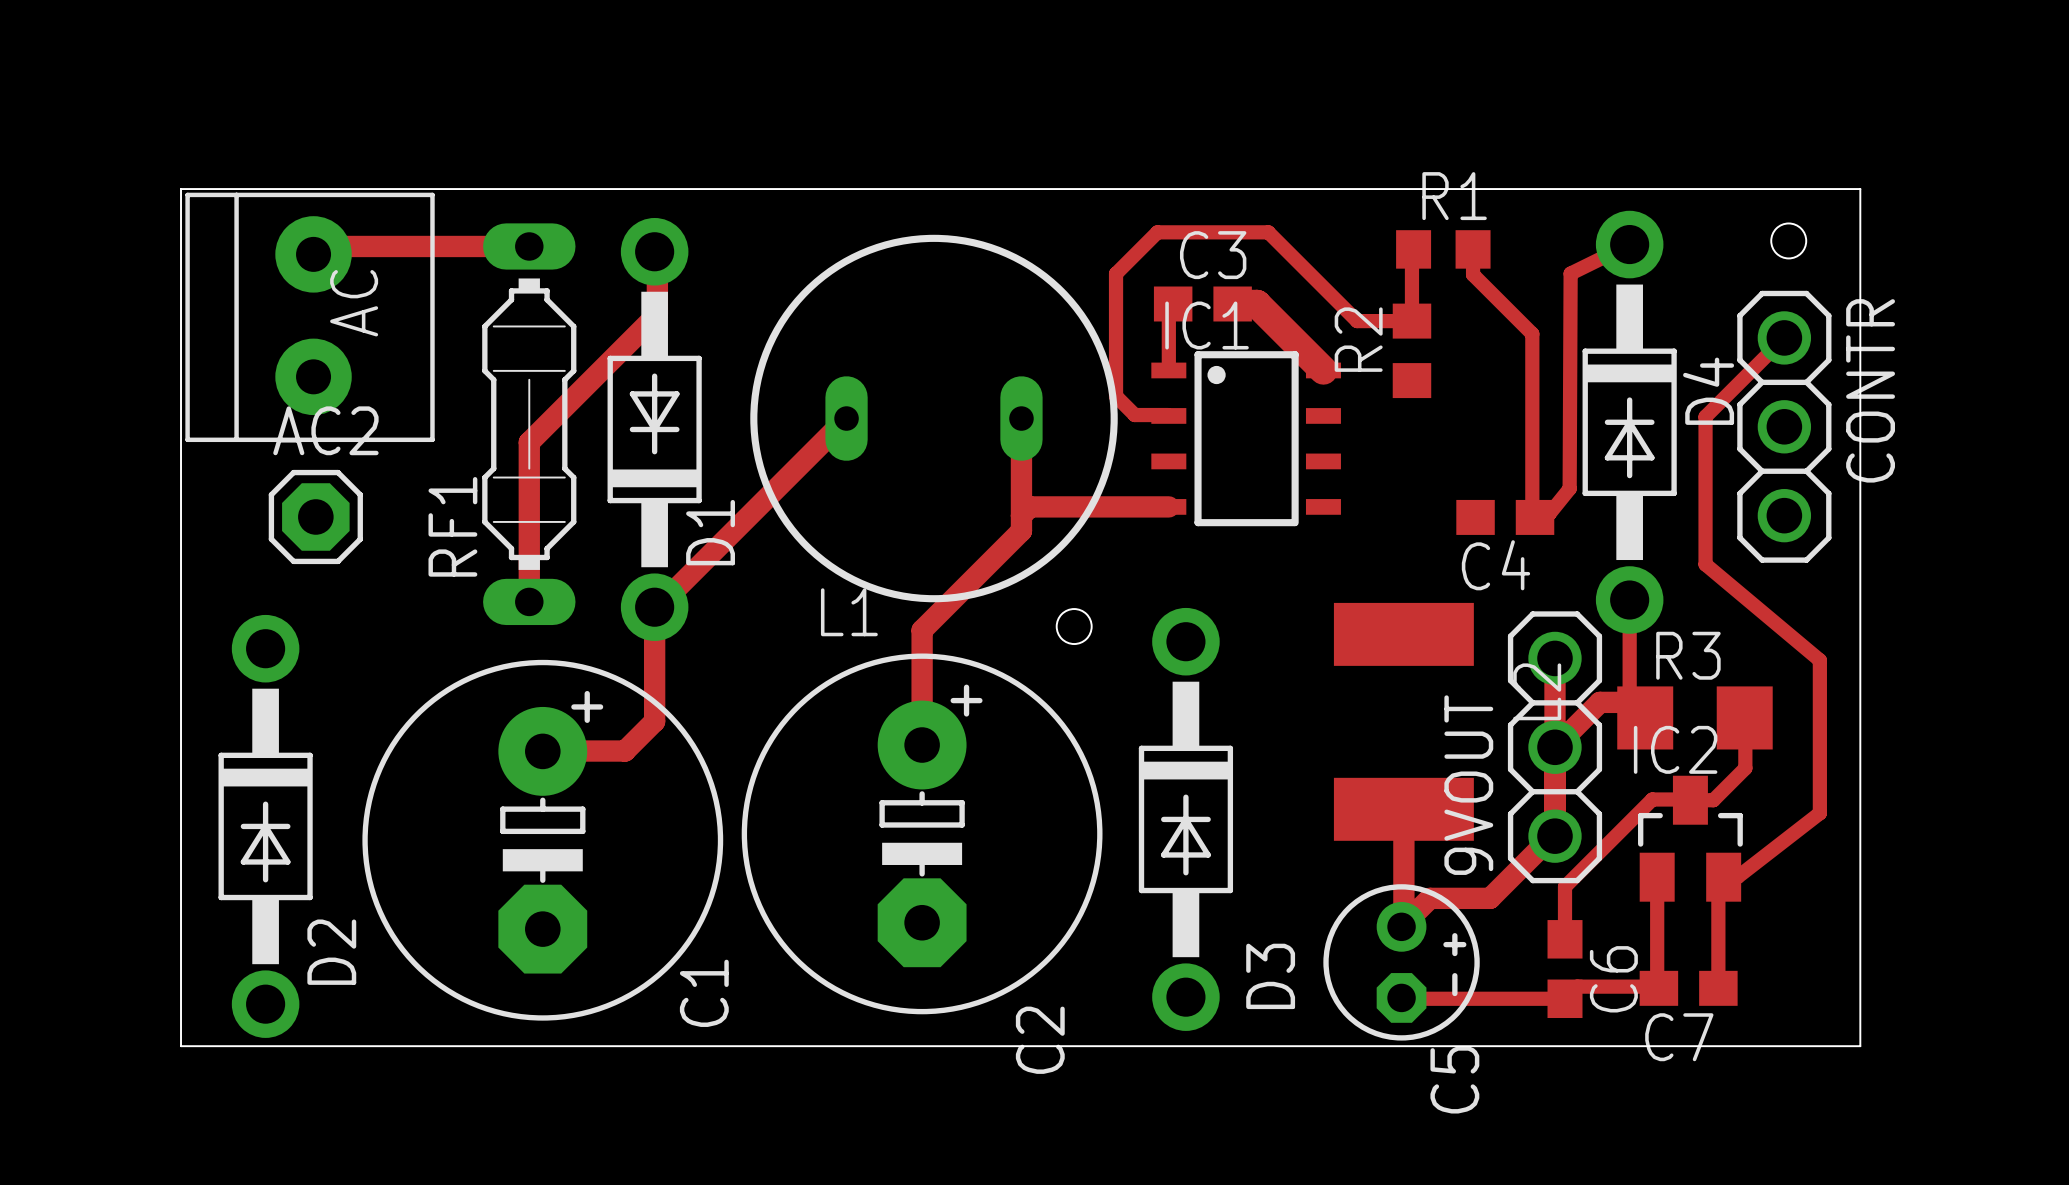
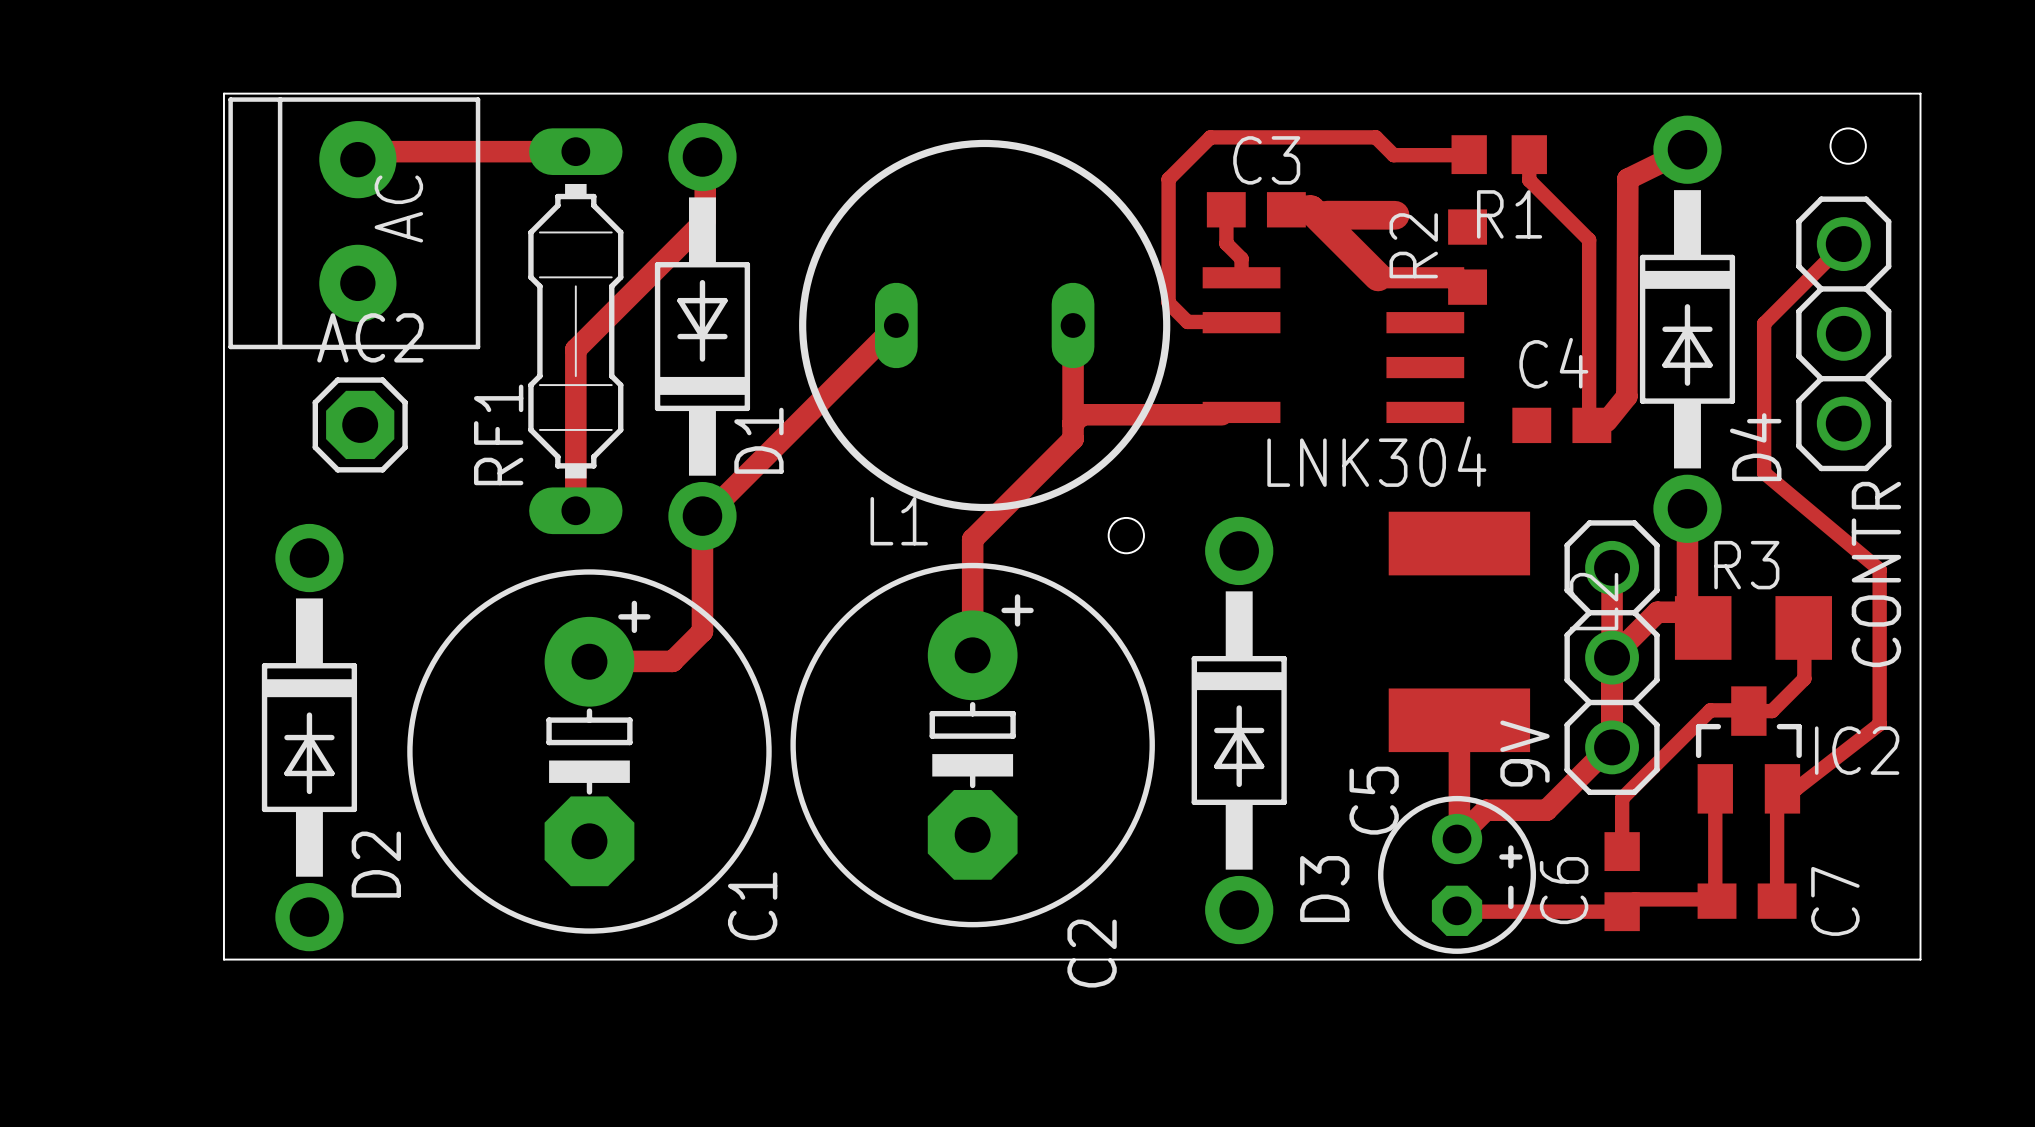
R1 name position: R1 (1454, 196) -> R1 (1509, 214)
track: (1268, 232) (1357, 321) (1411, 321) (1411, 251) -> (1322, 137) (1375, 137) (1393, 155) (1468, 155)
track width: thin (1629, 244) (1570, 273) (1569, 488) (1549, 513) -> thick (1687, 149) (1627, 179) (1626, 396) (1606, 421)
track: (1173, 303) (1168, 308) (1168, 370) -> (1226, 209) (1226, 243) (1241, 258) (1241, 277)
track: none -> (1327, 215) (1395, 215)
CONTR name position: CONTR (1870, 390) -> CONTR (1876, 574)
D4 name position: D4 (1708, 391) -> D4 (1755, 447)
LNK304: none -> (1333, 345)
IC1: (1246, 438) -> none
C4 name position: C4 (1495, 565) -> C4 (1553, 363)
track width: thin (1629, 600) (1629, 702) -> thick (1687, 508) (1687, 612)
IC2 name position: IC2 (1675, 749) -> IC2 (1857, 750)
9VOUT name: 9VOUT (1468, 785) -> 9V (1524, 753)
C6 name position: C6 (1613, 979) -> C6 (1564, 890)
C7 name rotation: 0° (1679, 1037) -> 90° counterclockwise (1835, 901)
C7 name position: C7 (1679, 1037) -> C7 (1835, 901)
C5 name position: C5 (1454, 1079) -> C5 (1374, 800)

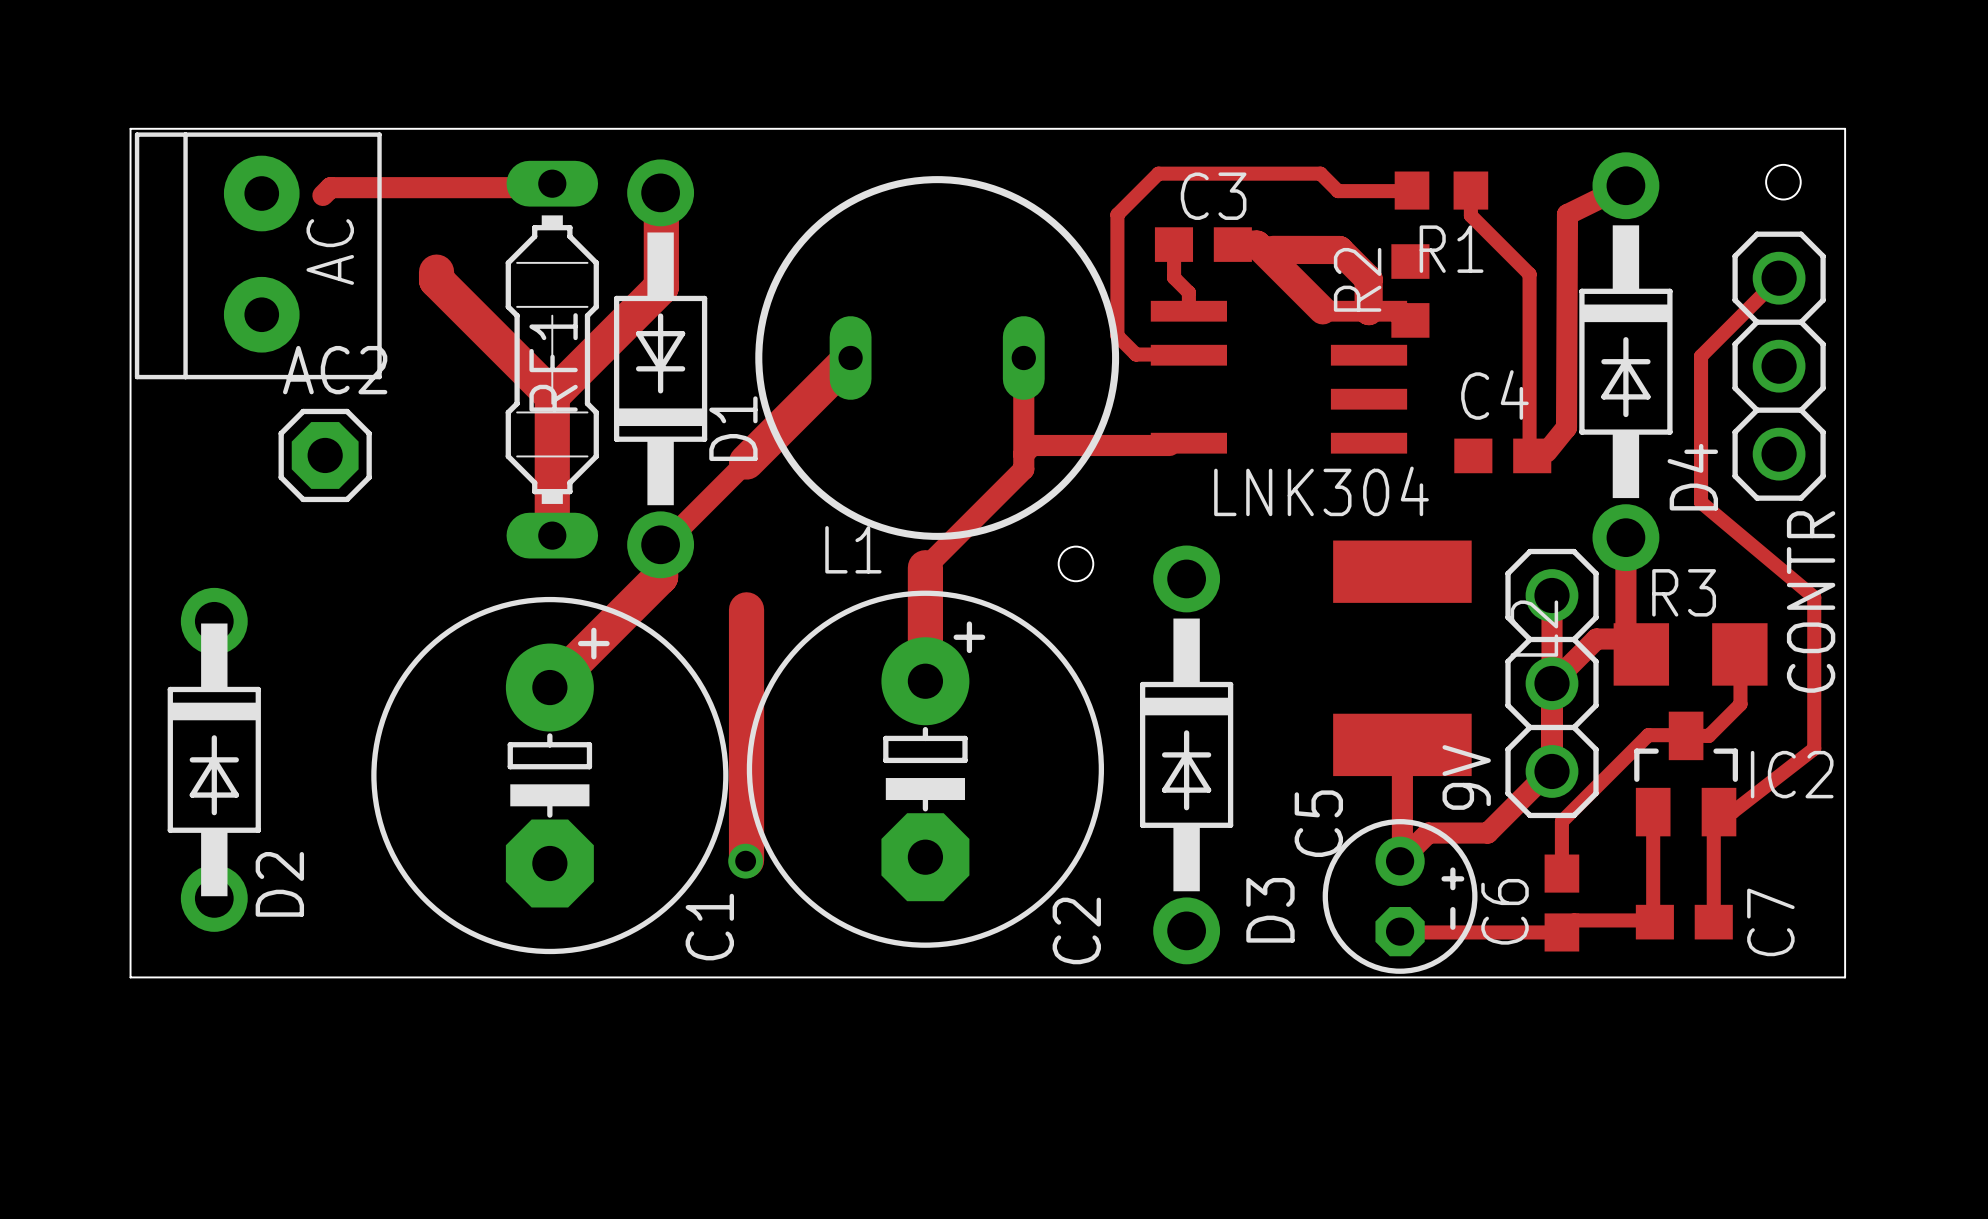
board edge: (223, 93) (1920, 93) (1920, 959) (223, 959) (223, 93) -> (130, 128) (130, 977) (1845, 977) (1845, 128) (130, 128)
track: (703, 157) (705, 159) (705, 220) (575, 349) (575, 510) -> (660, 192) (661, 286) (552, 396)
AC name position: AC (398, 209) -> AC (330, 251)
track: none -> (1339, 249) (1368, 279) (1368, 310)
AC position: (354, 223) -> (258, 255)
track: none -> (436, 272) (436, 280) (552, 396)
track width: thin (896, 325) (790, 431) -> thick (850, 358) (746, 462)
RF1 position: (575, 331) -> (552, 359)
track: none -> (552, 396) (552, 535)
RF1 name position: RF1 (498, 434) -> RF1 (553, 362)
D1 name position: D1 (758, 440) -> D1 (733, 428)
D2 footprint: [261, 523, 358, 952] -> [167, 587, 261, 932]
track width: thin (972, 539) (972, 655) -> thick (925, 567) (925, 681)
track: (702, 548) (702, 631) (672, 661) (589, 661) -> (660, 576) (549, 687)
track: none -> (746, 609) (745, 861)
via: none -> (745, 861)
C2 name position: C2 (1092, 953) -> C2 (1076, 930)

